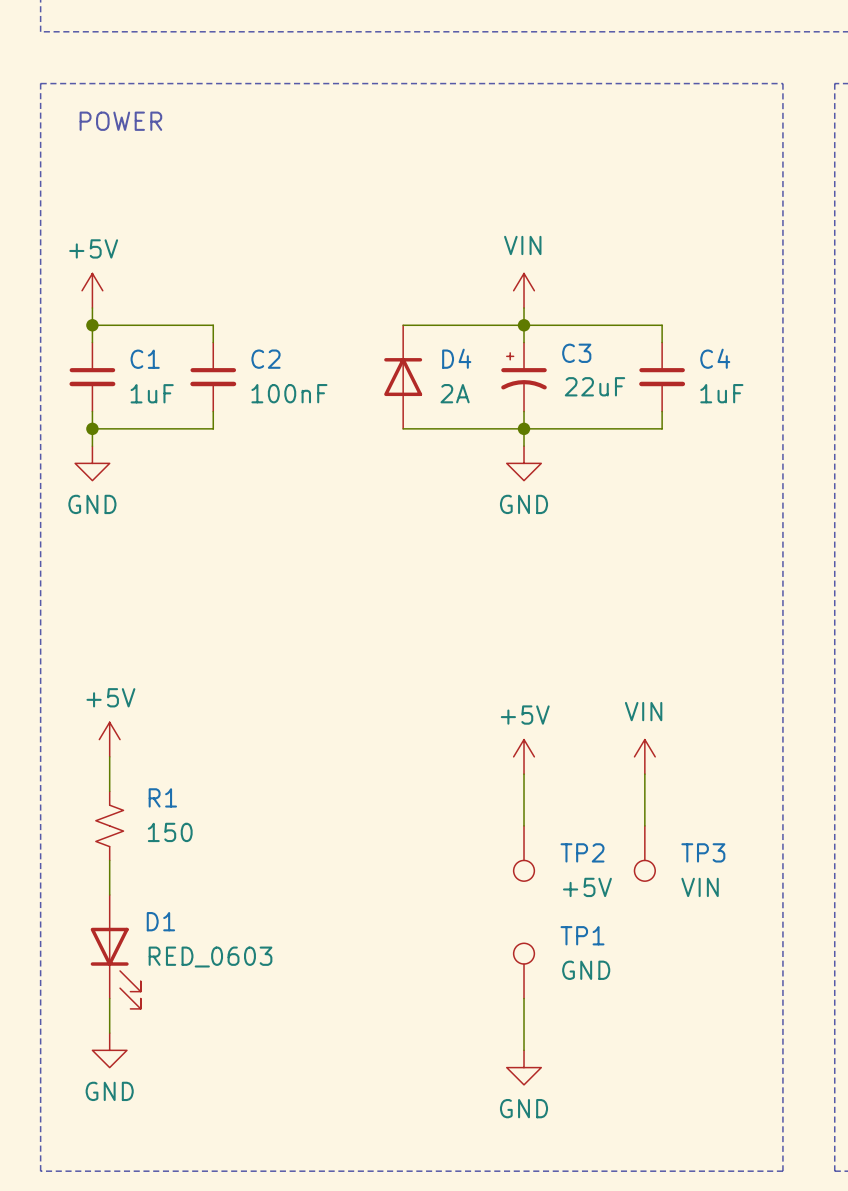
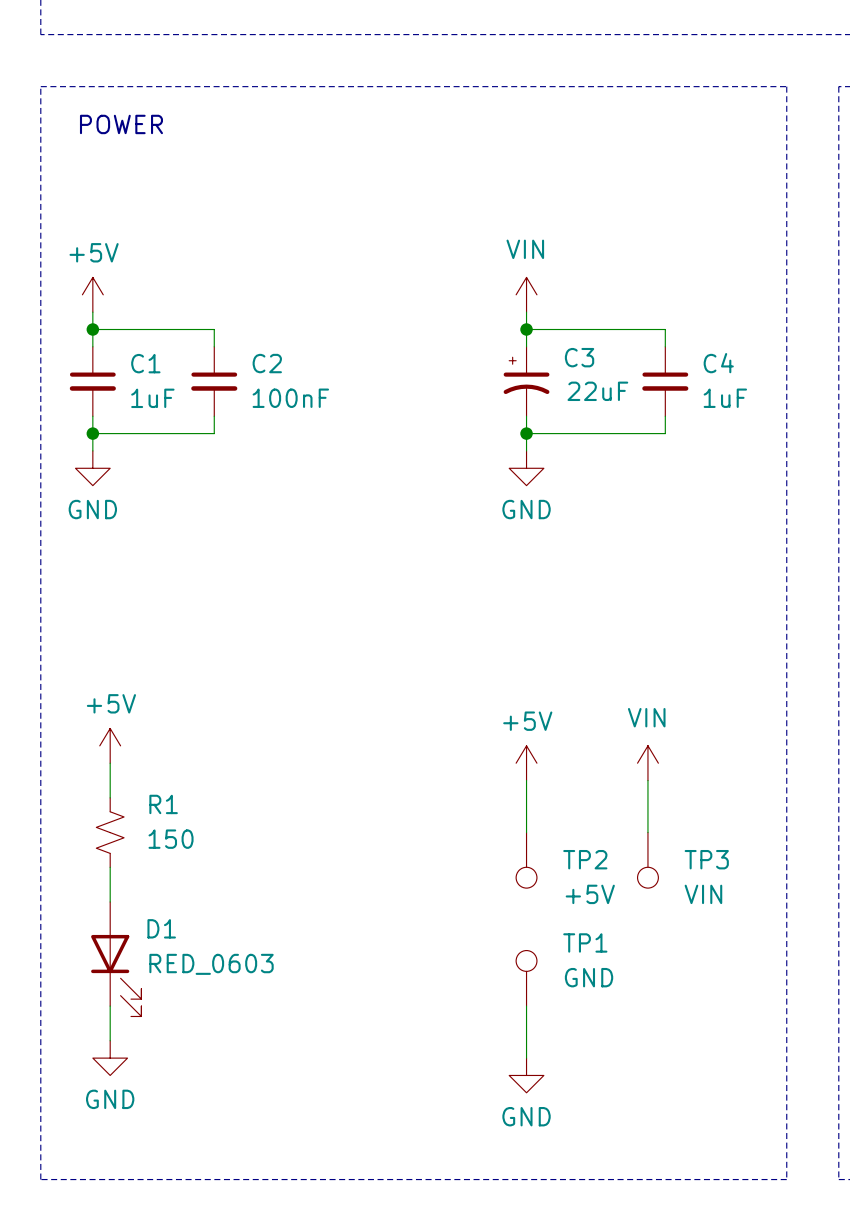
wire: (403, 325) (524, 325) -> none
D4: 2A (403, 377) -> none
wire: (403, 428) (524, 428) -> none

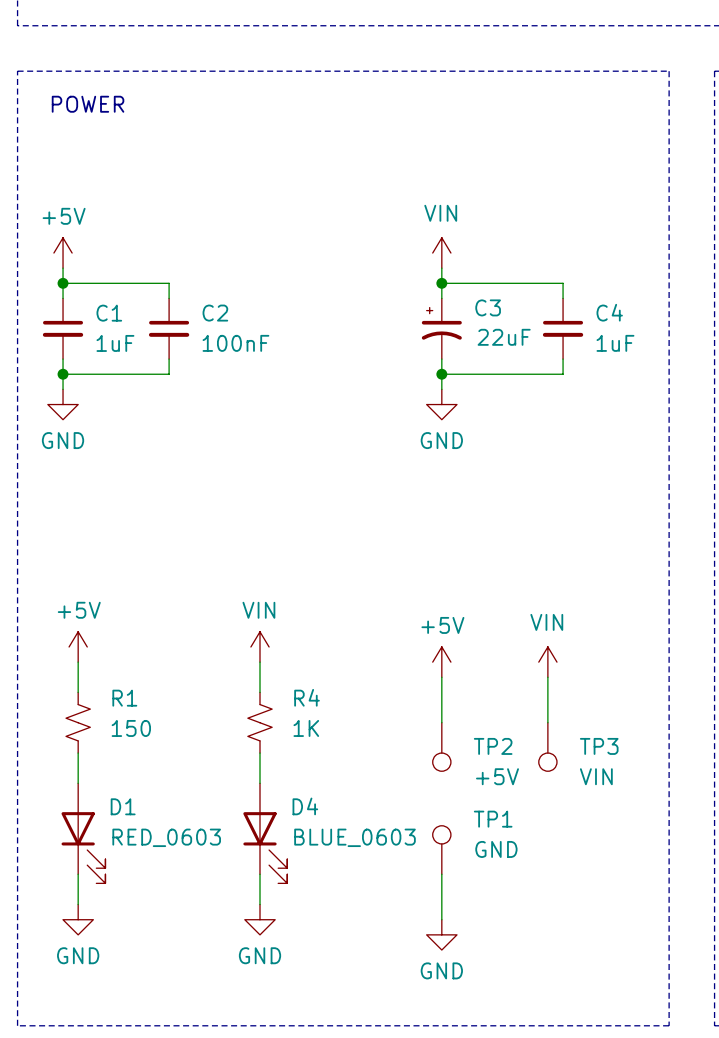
power symbol: none -> VIN (260, 646)
wire: none -> (260, 662) (260, 692)
R4: none -> 1K (260, 722)
wire: none -> (260, 753) (260, 783)
D4: none -> BLUE_0603 (265, 833)
wire: none -> (260, 874) (260, 904)
power symbol: none -> GND (260, 919)

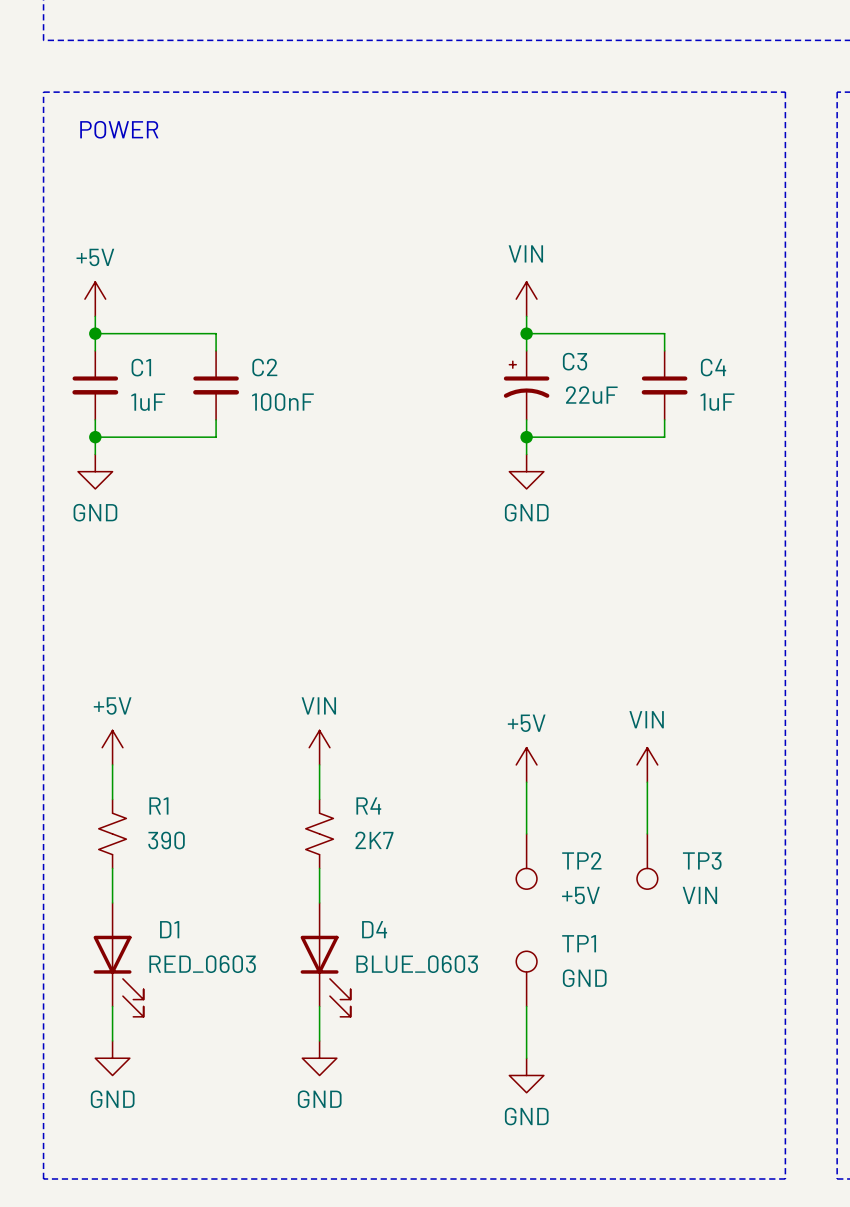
R1 value: 150 (131, 728) -> 390 (166, 840)
R4 value: 1K (306, 728) -> 2K7 (374, 840)

